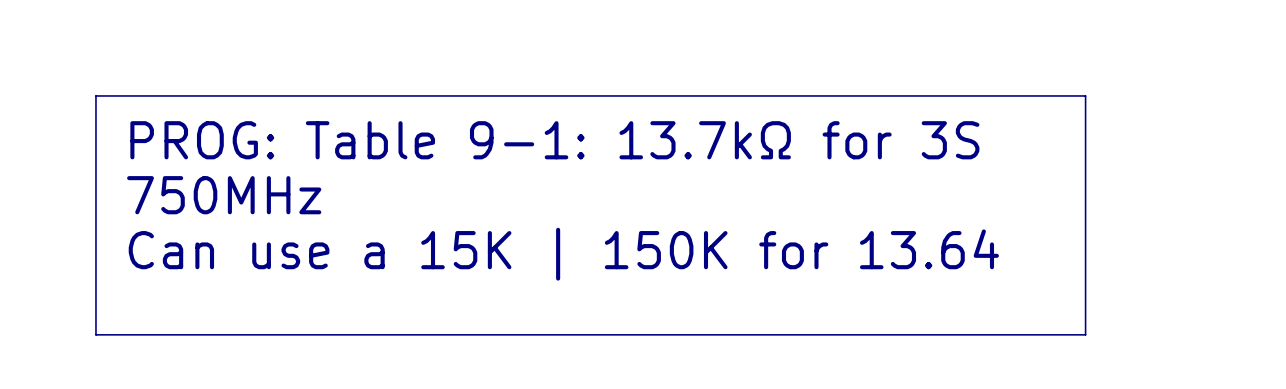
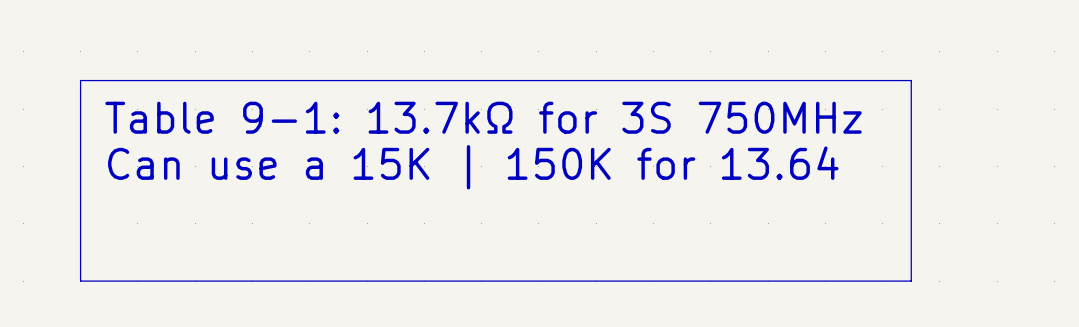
text: PROG: Table 9-1: 13.7kΩ for 3S (554, 140) -> Table 9-1: 13.7kΩ for 3S 750MHz (483, 117)
text: 750MHz (224, 195) -> Can use a 15K | 150K for 13.64 (473, 167)
text: Can use a 15K | 150K for 13.64 (563, 254) -> none

